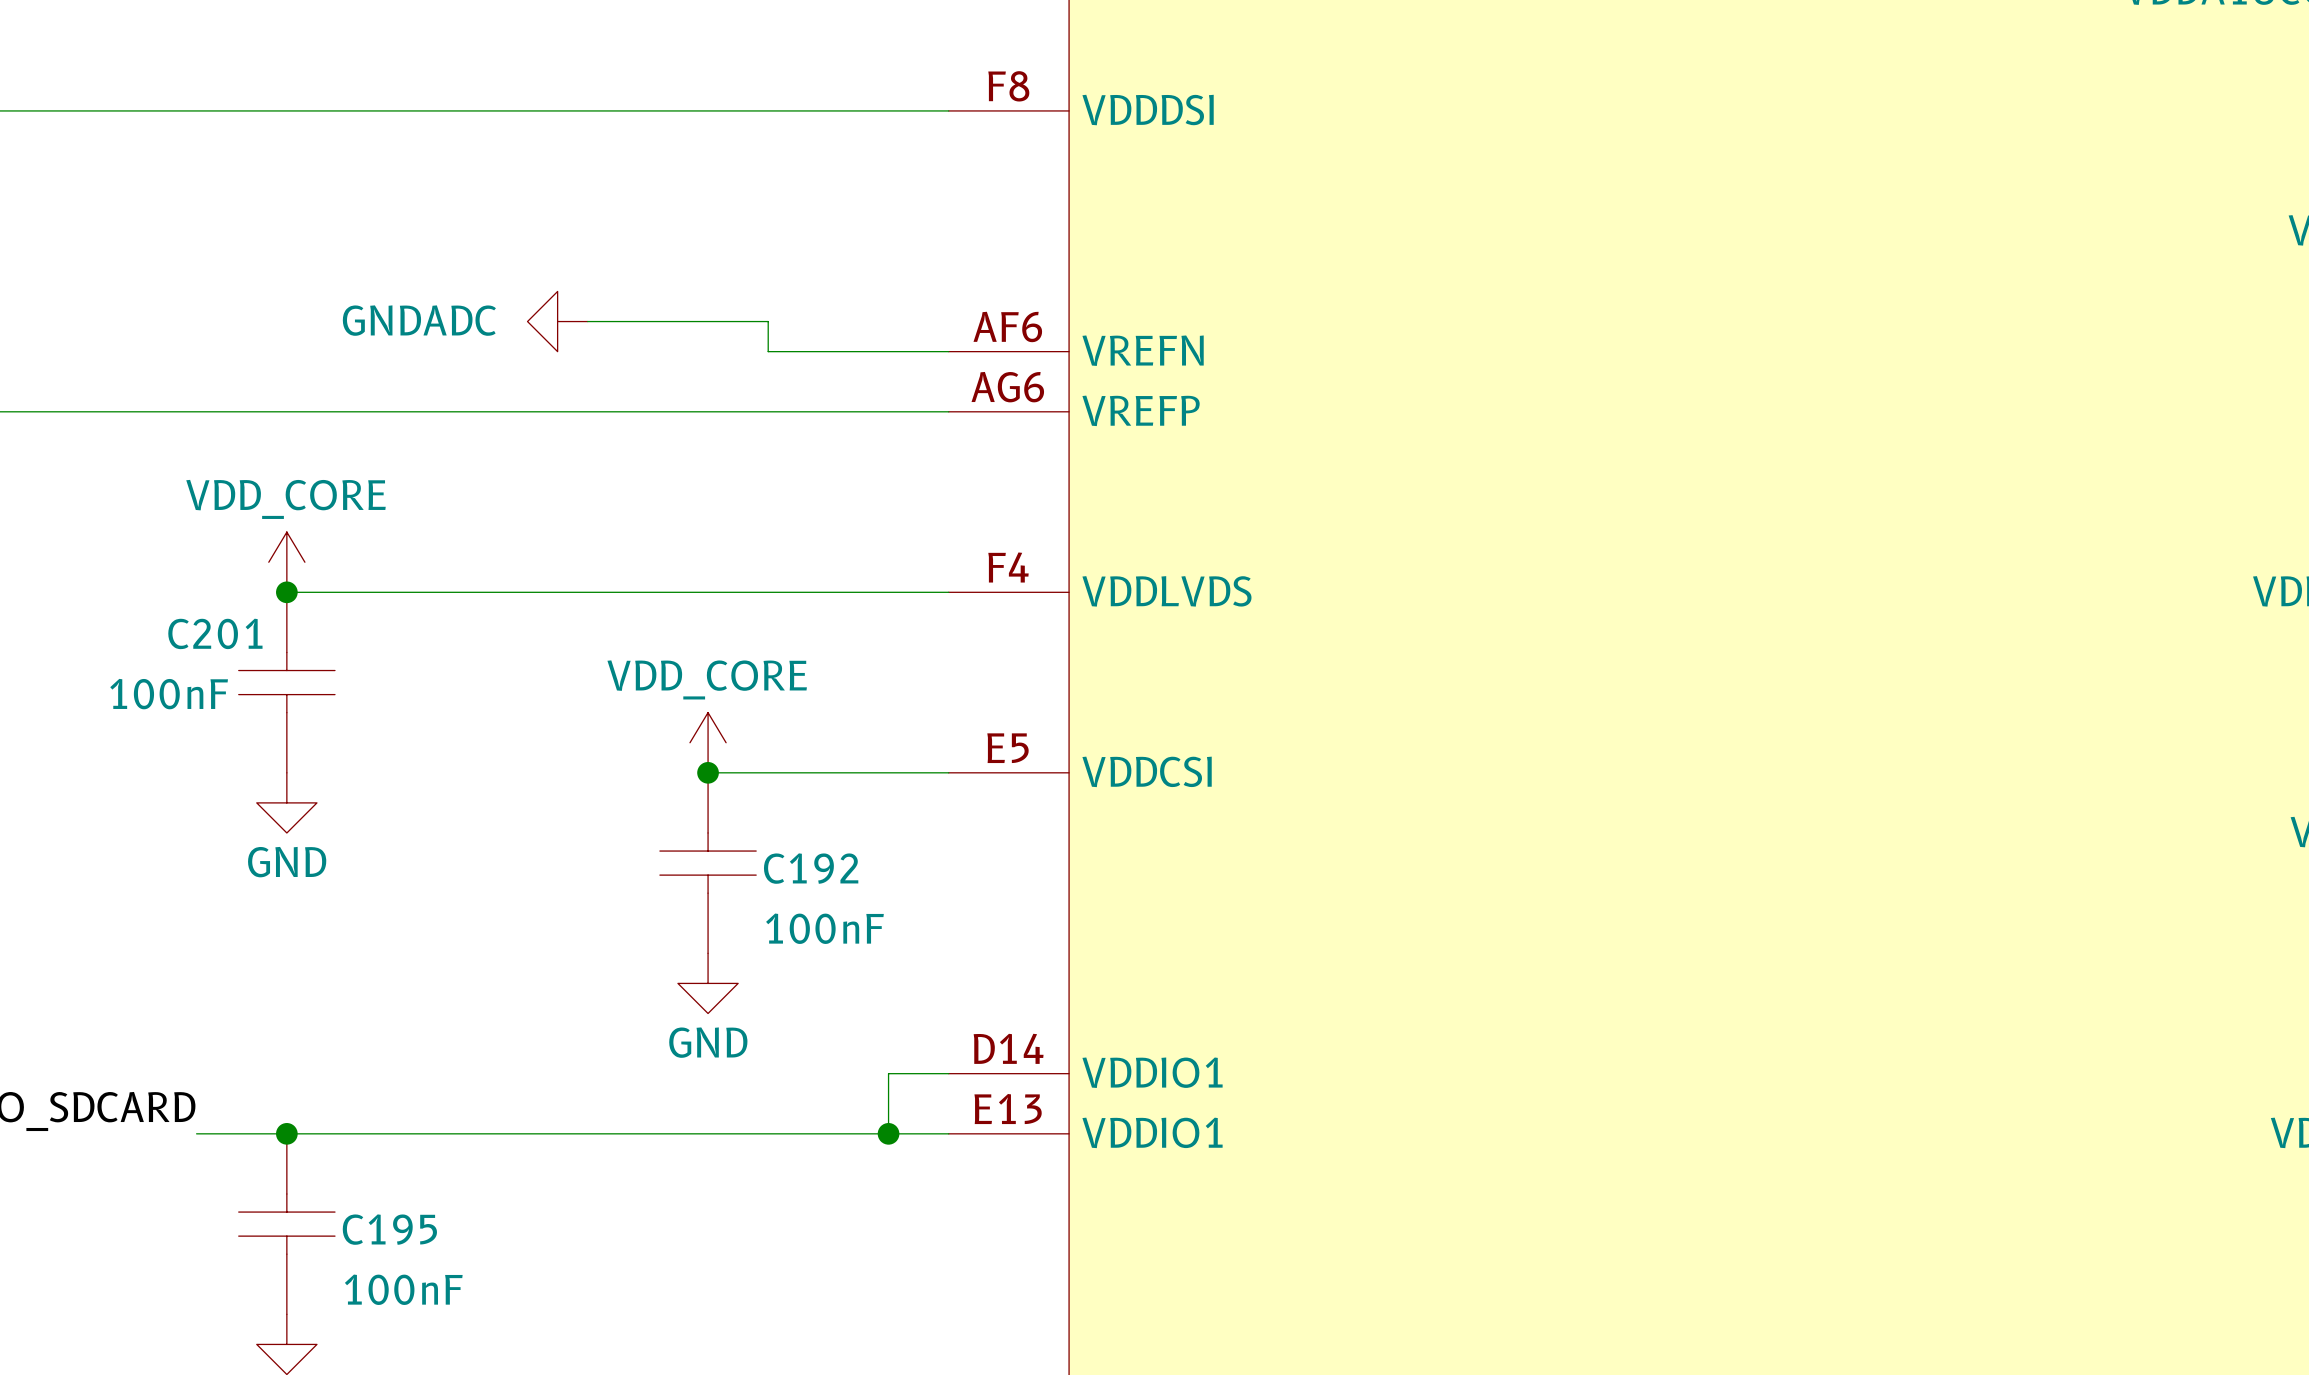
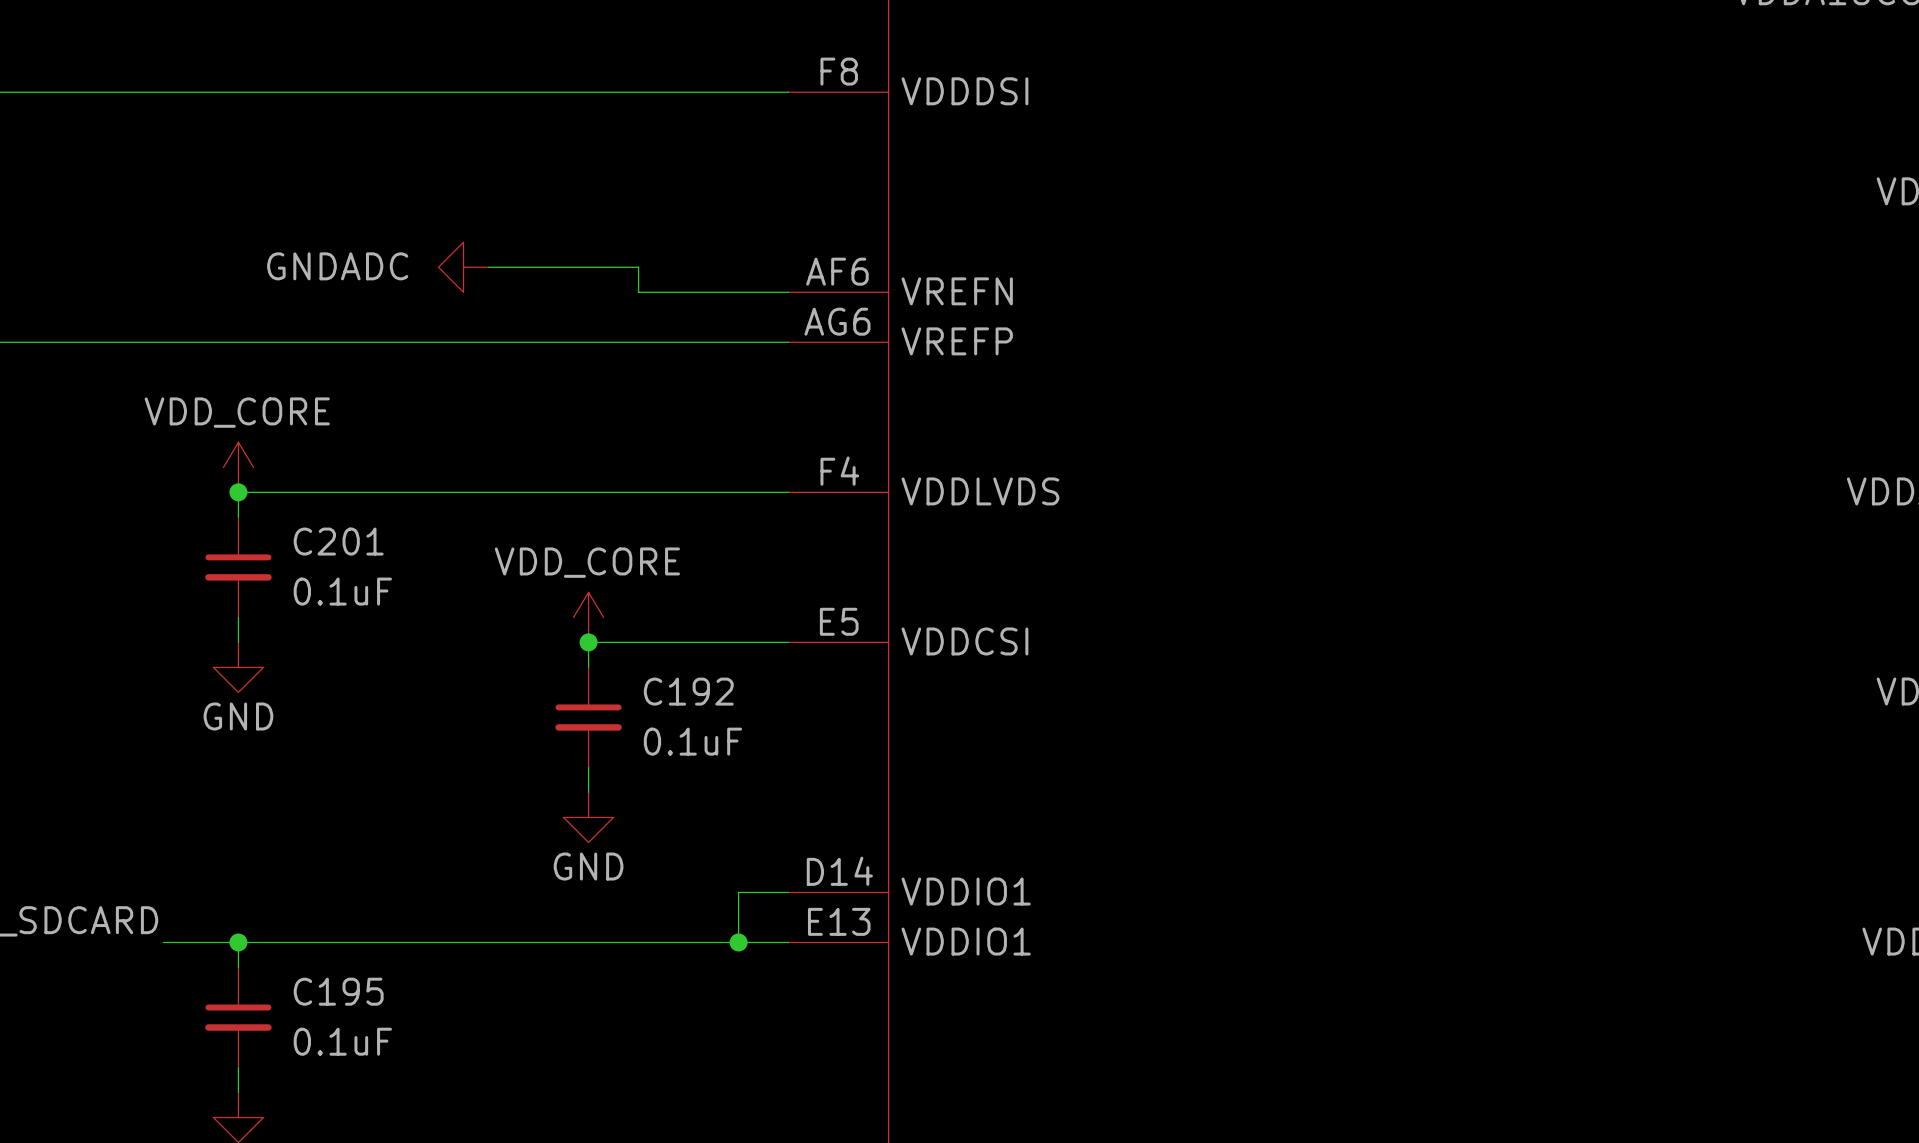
C201 symbol: [238, 592, 335, 773] -> [205, 517, 272, 618]
C201 name position: C201 (215, 633) -> C201 (338, 541)
C201 text: 100nF (169, 694) -> none
C201 text: none -> 0.1uF (342, 591)
C192 symbol: [659, 772, 757, 954] -> [555, 667, 622, 768]
C192 text: none -> 0.1uF (692, 741)
C192 text: 100nF (824, 928) -> none
C195 symbol: [238, 1133, 335, 1315] -> [205, 967, 272, 1068]
C195 text: none -> 0.1uF (342, 1041)
C195 text: 100nF (403, 1289) -> none

